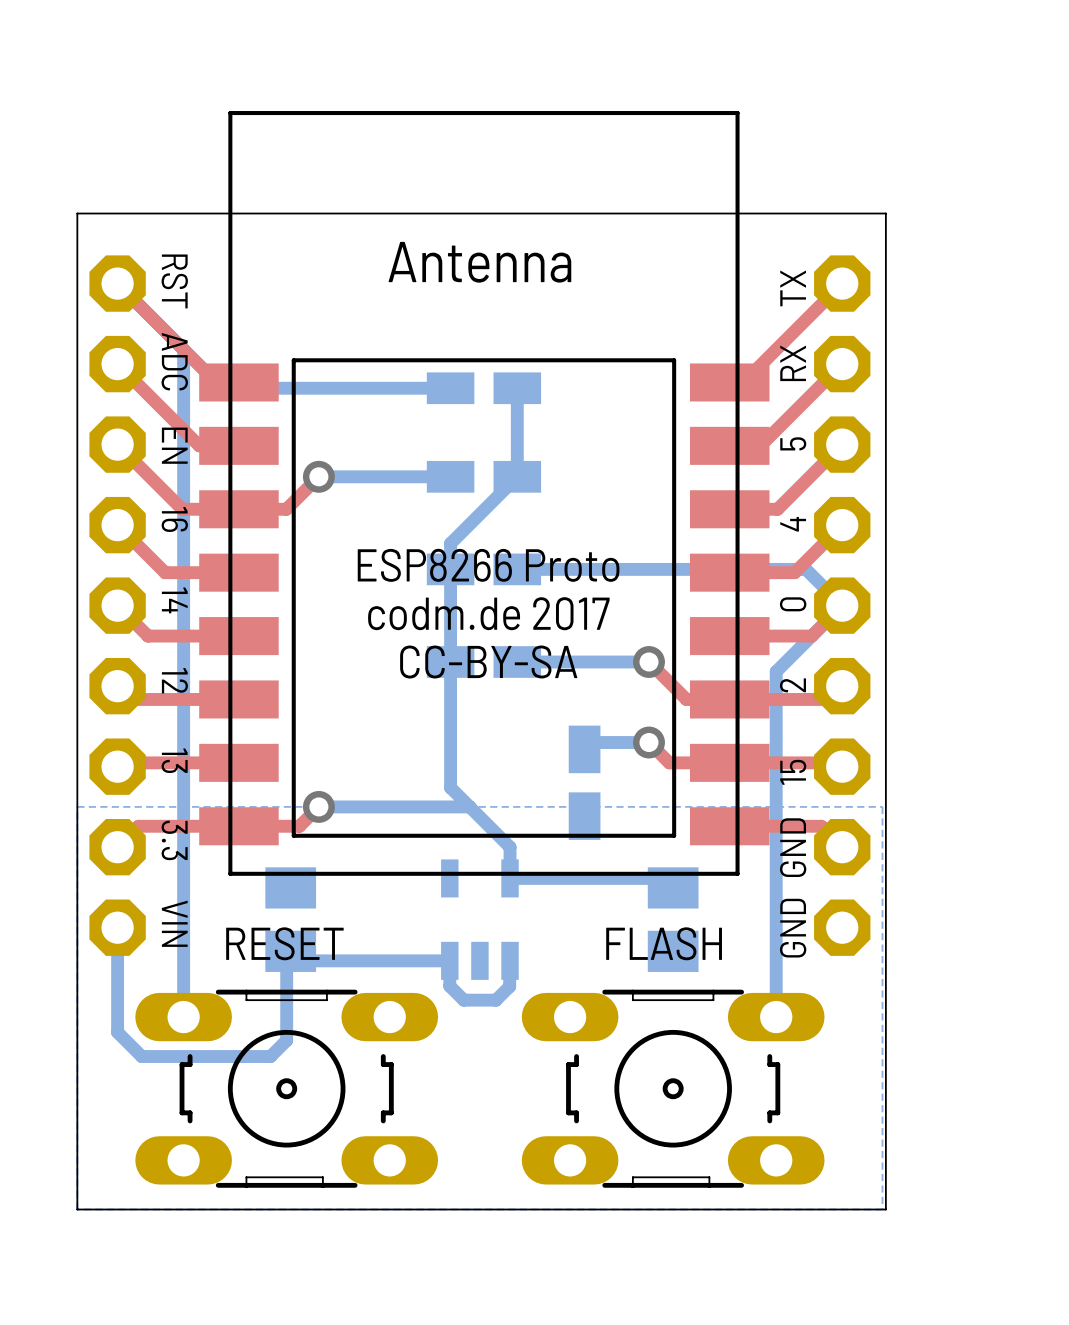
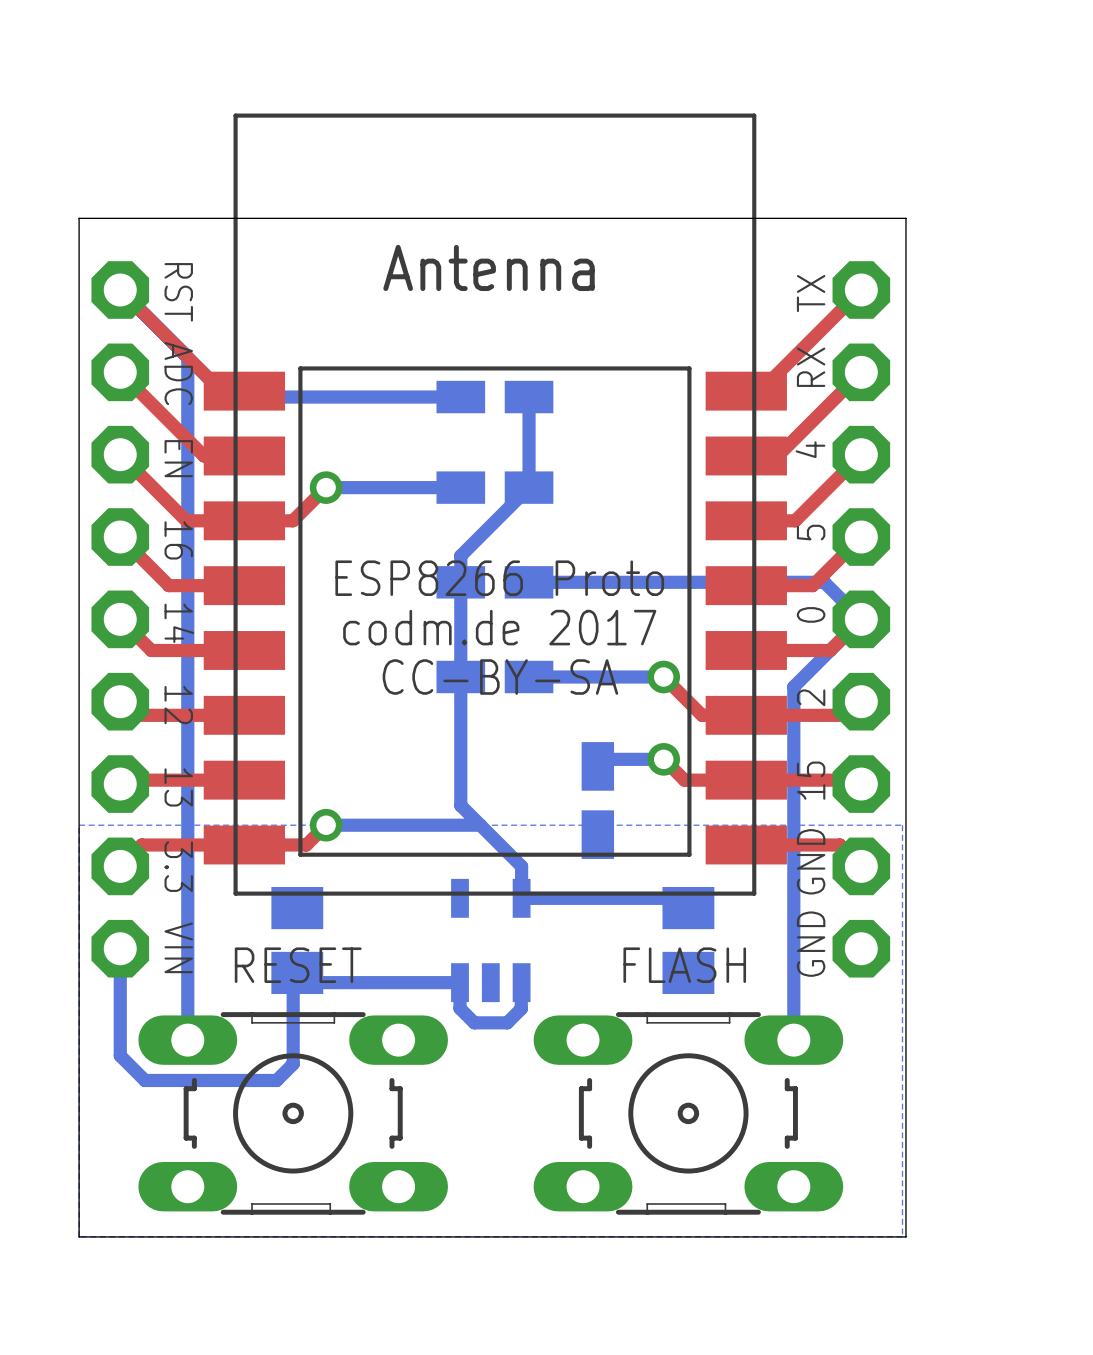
text: 5 (793, 443) -> 4 (810, 449)
text: 4 (793, 524) -> 5 (811, 532)

